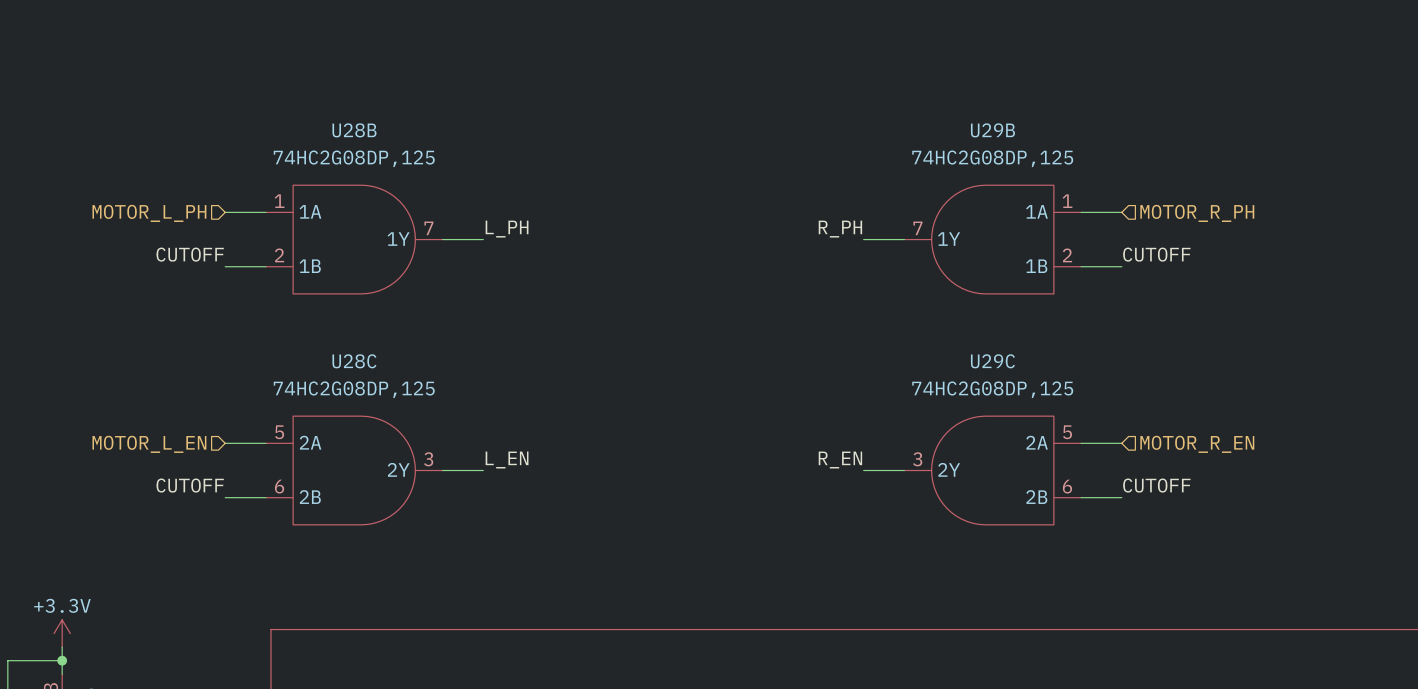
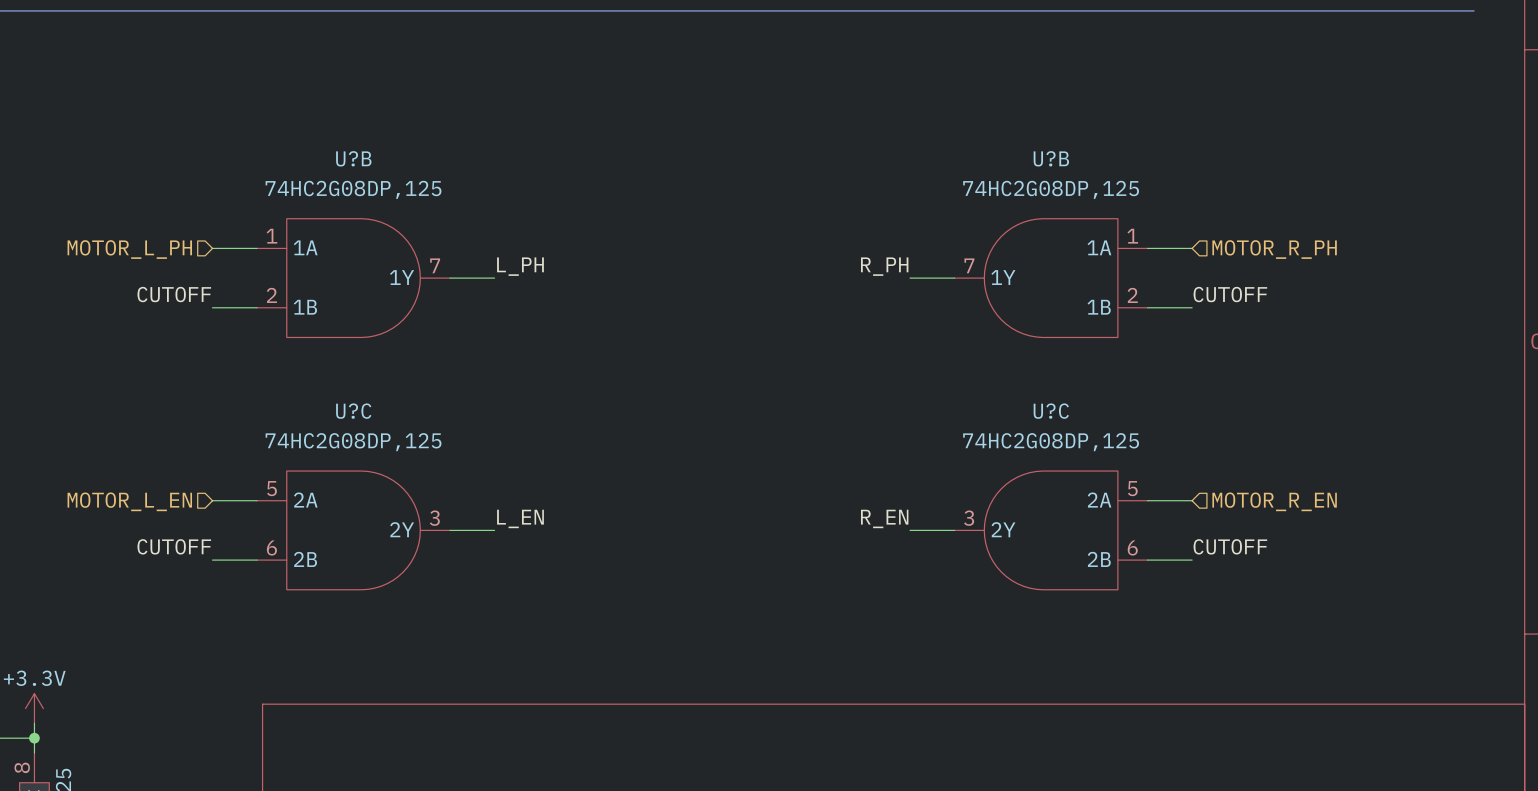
U28B name: U28B (354, 130) -> U?B (353, 158)
U29B name: U29B (992, 130) -> U?B (1051, 158)
U28C name: U28C (354, 361) -> U?C (353, 411)
U29C name: U29C (992, 361) -> U?C (1051, 411)

